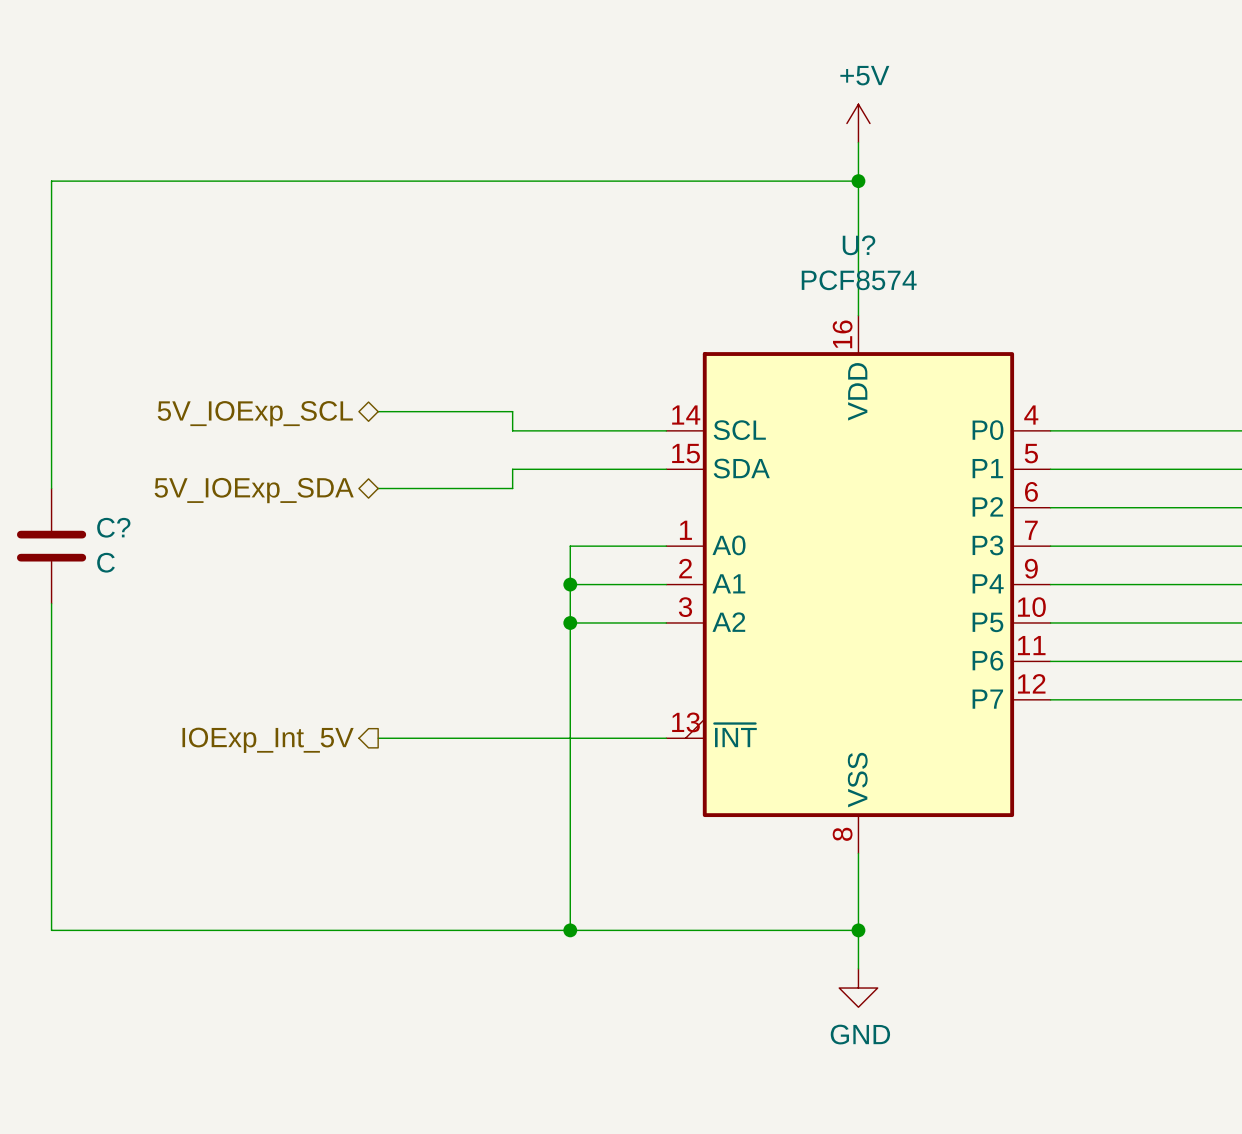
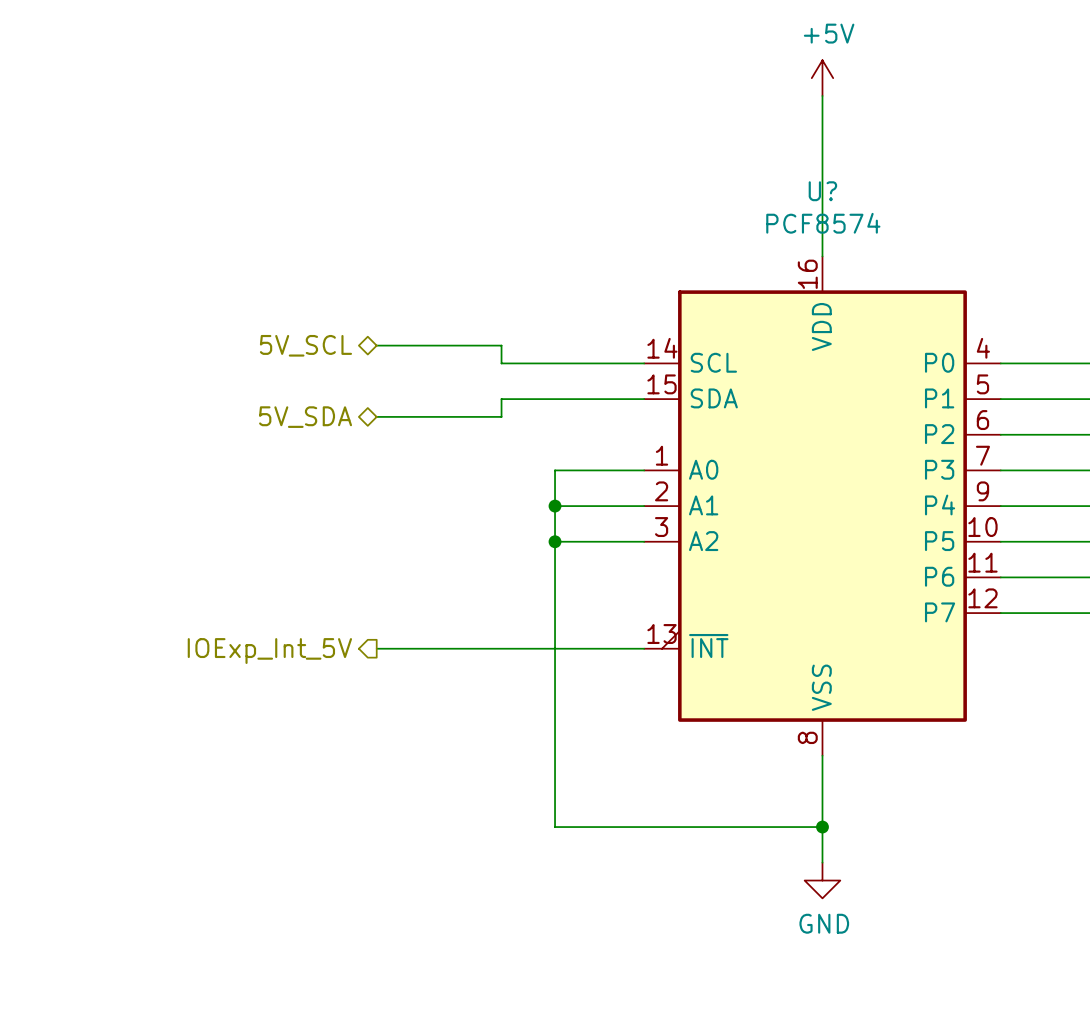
wire: (858, 181) (51, 181) (51, 488) -> none
junction: (858, 181) -> none
hierarchical label: 5V_IOExp_SCL (255, 413) -> 5V_SCL (305, 345)
hierarchical label: 5V_IOExp_SDA (254, 490) -> 5V_SDA (305, 417)
C?: C (51, 546) -> none
wire: (51, 603) (51, 930) (570, 930) -> none
junction: (570, 930) -> none

